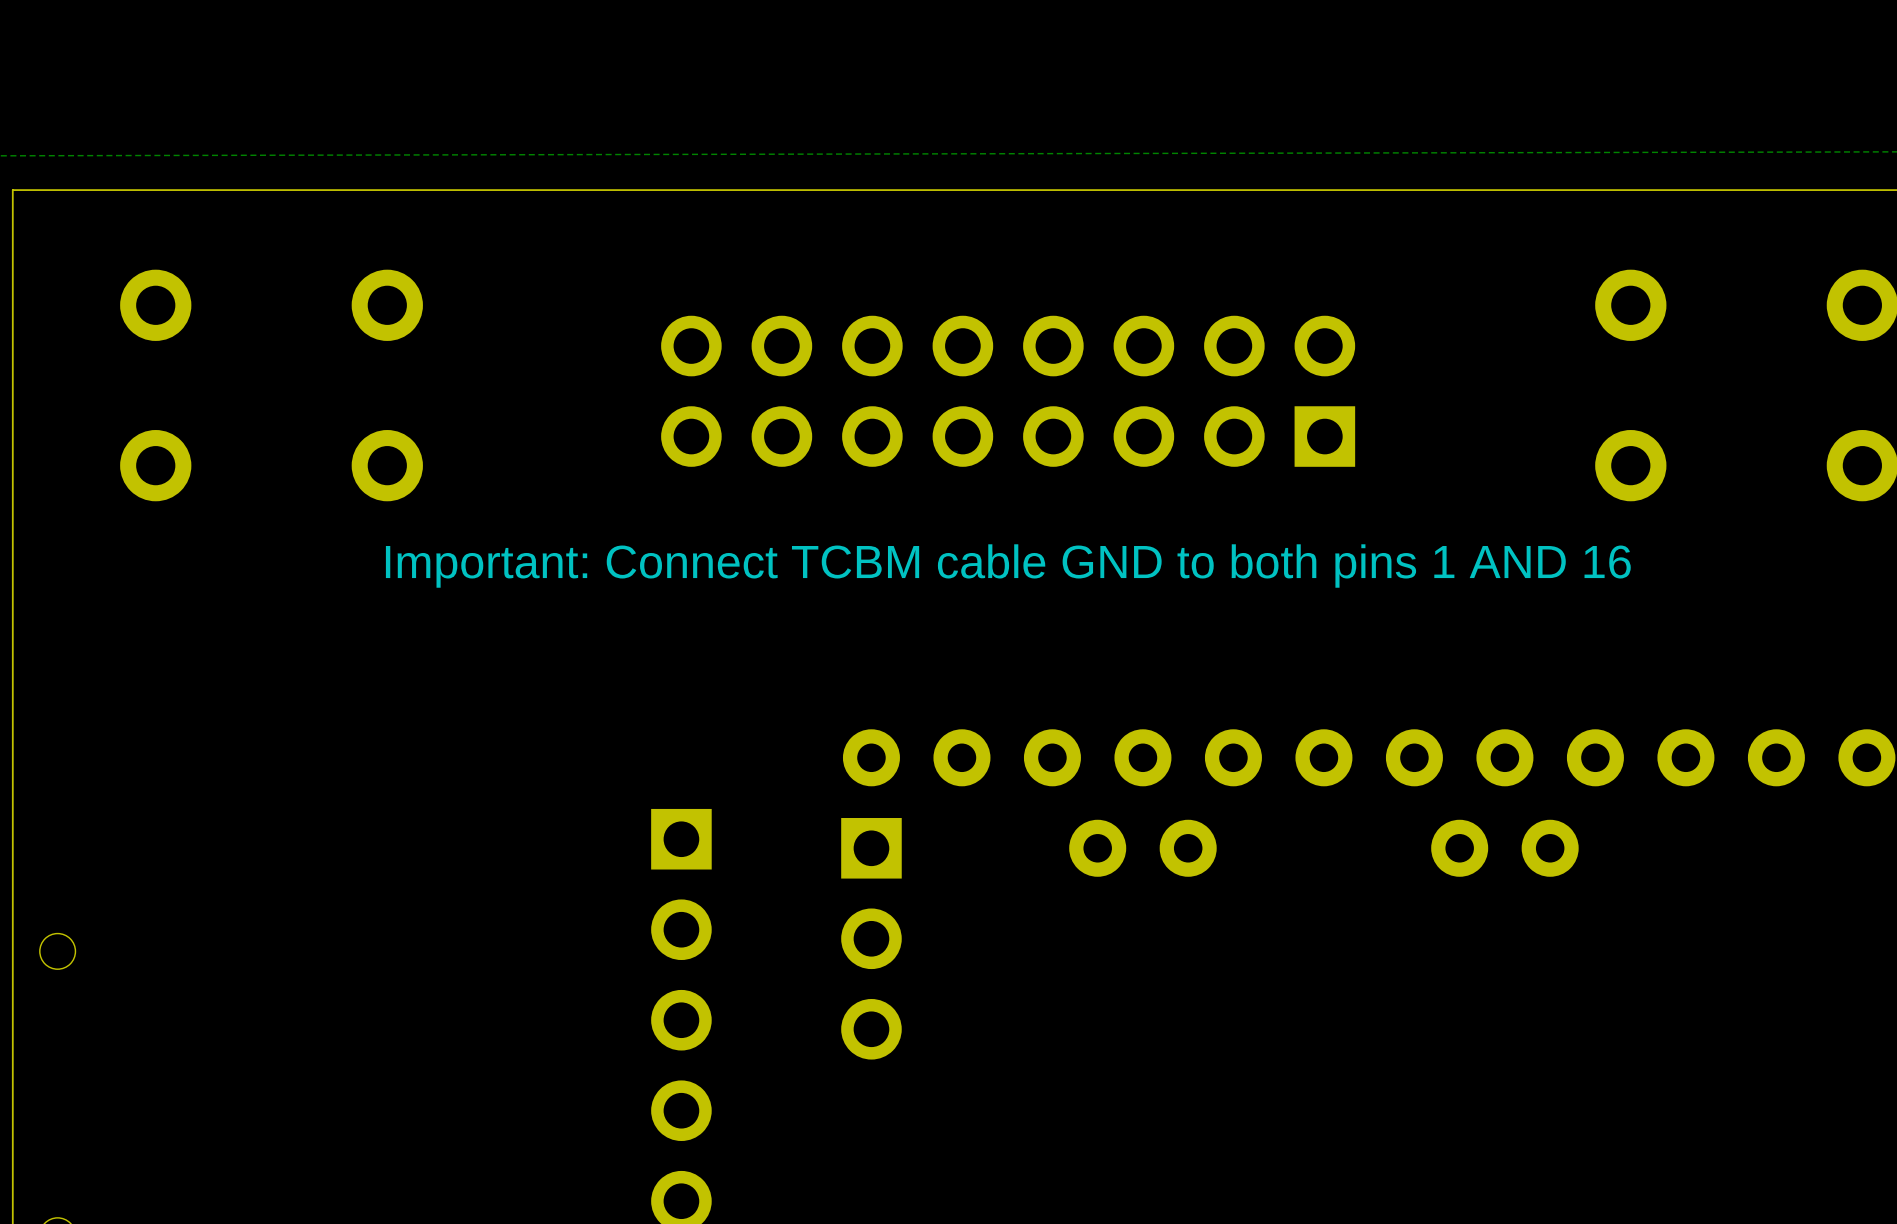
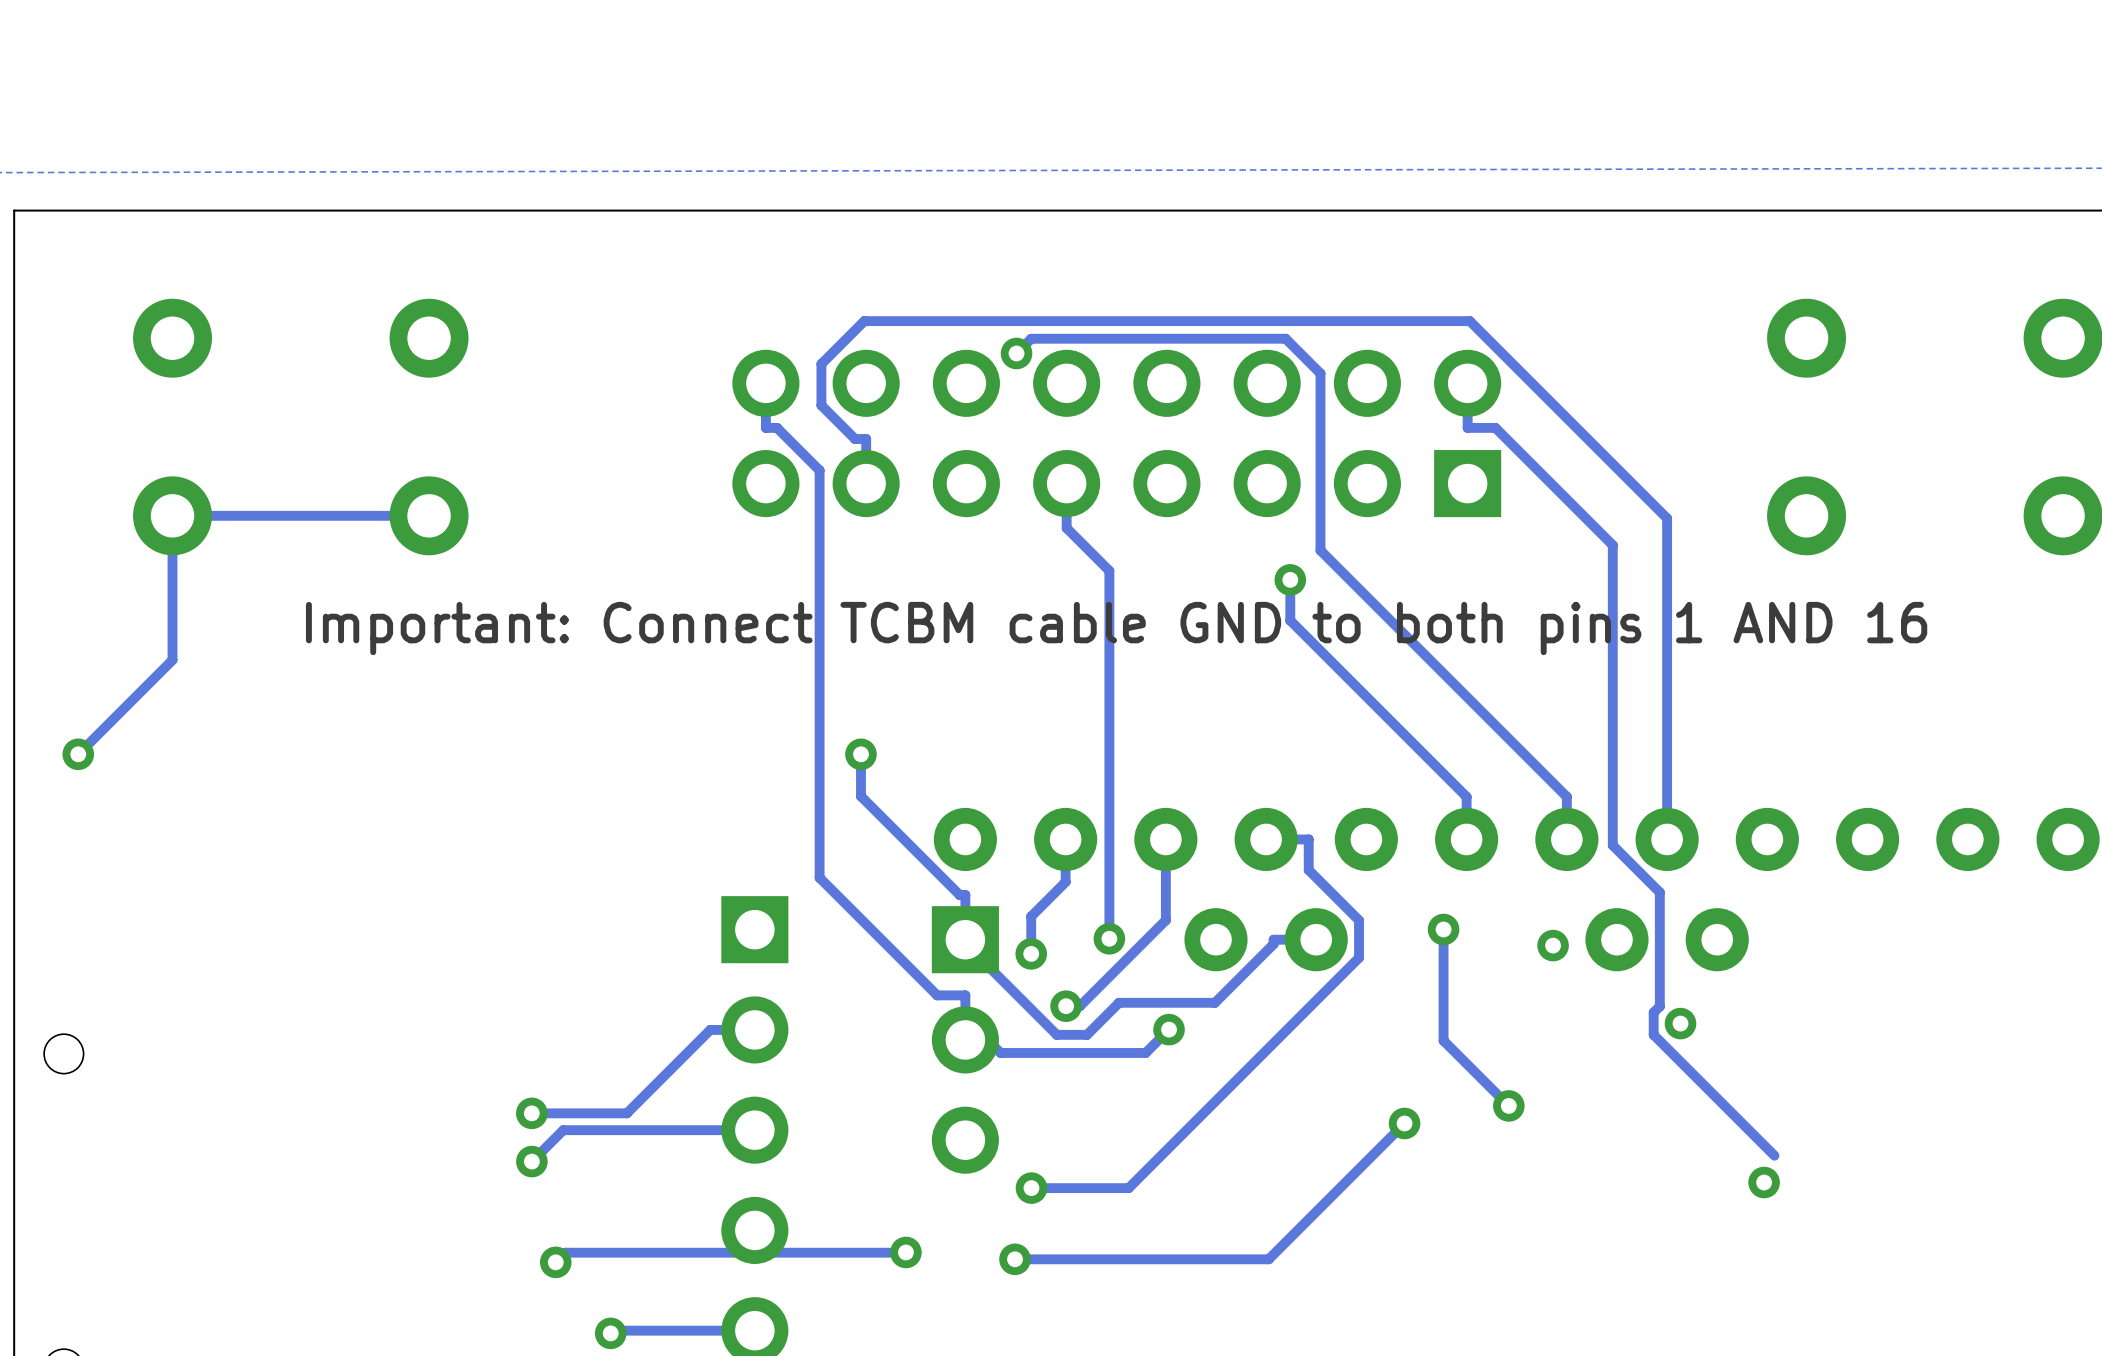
track: none -> (1016, 353) (1031, 338) (1285, 338) (1320, 373) (1320, 550) (1566, 796) (1566, 825)
via: none -> (1016, 353)
track: none -> (765, 383) (765, 427) (777, 427) (819, 470) (819, 877) (937, 995) (965, 995) (965, 1017) (1000, 1052) (1145, 1052) (1169, 1029)
track: none -> (1467, 383) (1467, 427) (1495, 427) (1612, 545) (1612, 845) (1659, 892) (1659, 1006) (1653, 1012) (1653, 1034) (1774, 1155)
track: none -> (866, 483) (866, 439) (855, 439) (821, 405) (821, 364) (864, 321) (1469, 321) (1667, 518) (1667, 839)
track: none -> (1066, 483) (1066, 528) (1109, 570) (1109, 938)
track: none -> (429, 515) (172, 515) (172, 660) (78, 754)
track: none -> (1290, 579) (1290, 620) (1466, 796) (1466, 839)
via: none -> (1290, 579)
via: none -> (78, 754)
track: none -> (860, 754) (860, 796) (959, 895) (965, 895) (965, 939)
via: none -> (860, 754)
track: none -> (1065, 839) (1065, 882) (1031, 916) (1031, 953)
track: none -> (1165, 839) (1165, 920) (1079, 1006) (1066, 1006)
track: none -> (1266, 839) (1308, 839) (1308, 870) (1359, 920) (1359, 957) (1128, 1188) (1031, 1188)
track: none -> (1443, 929) (1443, 1040) (1508, 1105)
via: none -> (1443, 929)
via: none -> (1109, 938)
track: none -> (1316, 939) (1273, 939) (1273, 944) (1214, 1002) (1119, 1002) (1087, 1034) (1056, 1034) (965, 943)
via: none -> (1553, 945)
via: none -> (1031, 953)
via: none -> (1066, 1006)
via: none -> (1680, 1023)
track: none -> (754, 1029) (710, 1029) (626, 1113) (531, 1113)
via: none -> (1169, 1029)
via: none -> (1508, 1105)
via: none -> (531, 1113)
track: none -> (1404, 1123) (1268, 1259) (1015, 1259)
via: none -> (1404, 1123)
track: none -> (754, 1130) (563, 1130) (531, 1161)
via: none -> (531, 1161)
via: none -> (1764, 1182)
via: none -> (1031, 1188)
track: none -> (905, 1252) (565, 1252) (555, 1262)
via: none -> (905, 1252)
via: none -> (1015, 1259)
via: none -> (555, 1262)
track: none -> (754, 1330) (613, 1330) (610, 1333)
via: none -> (610, 1333)

